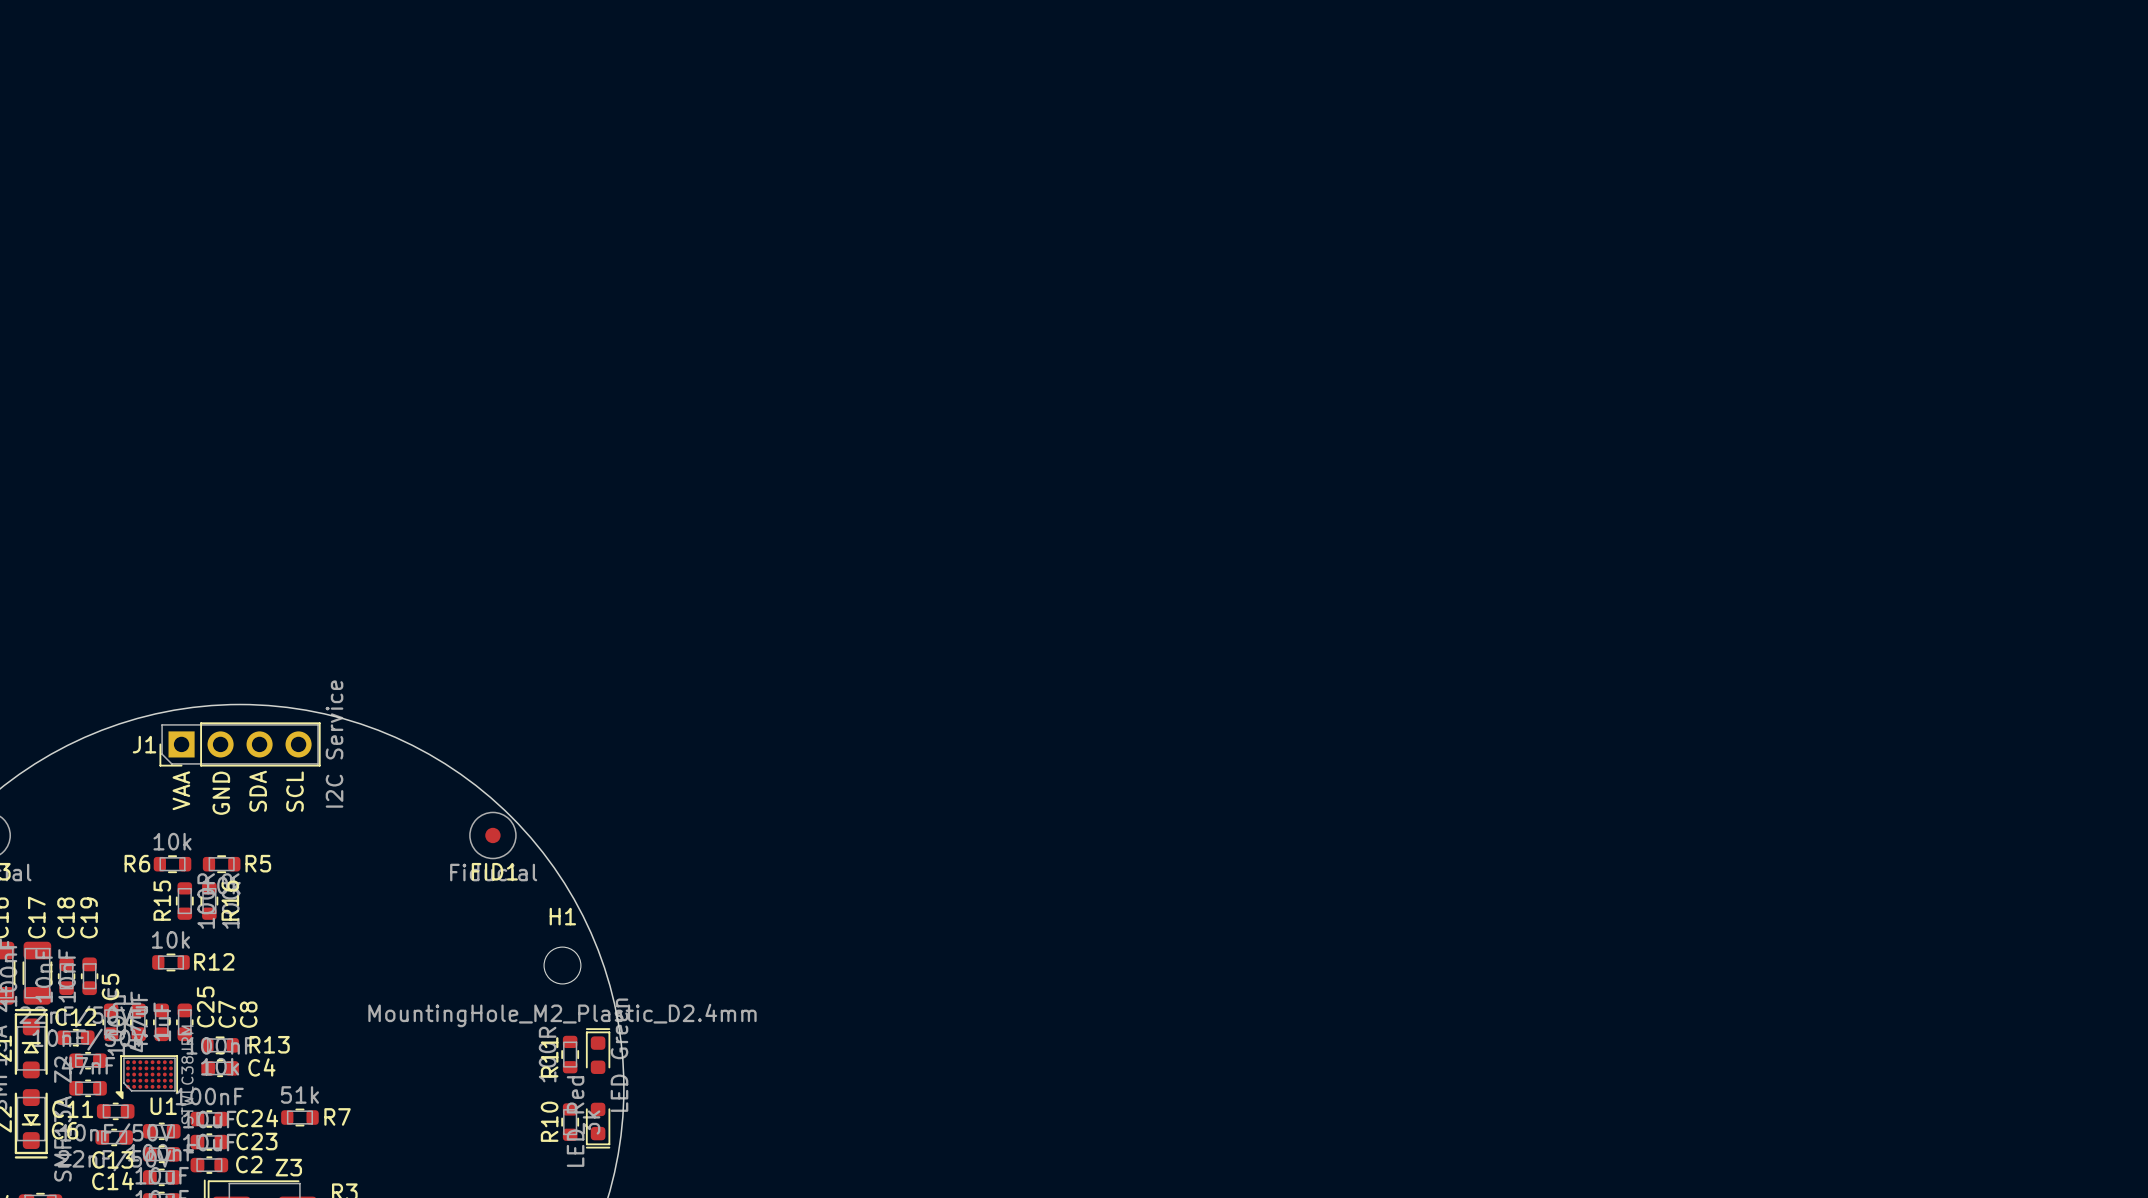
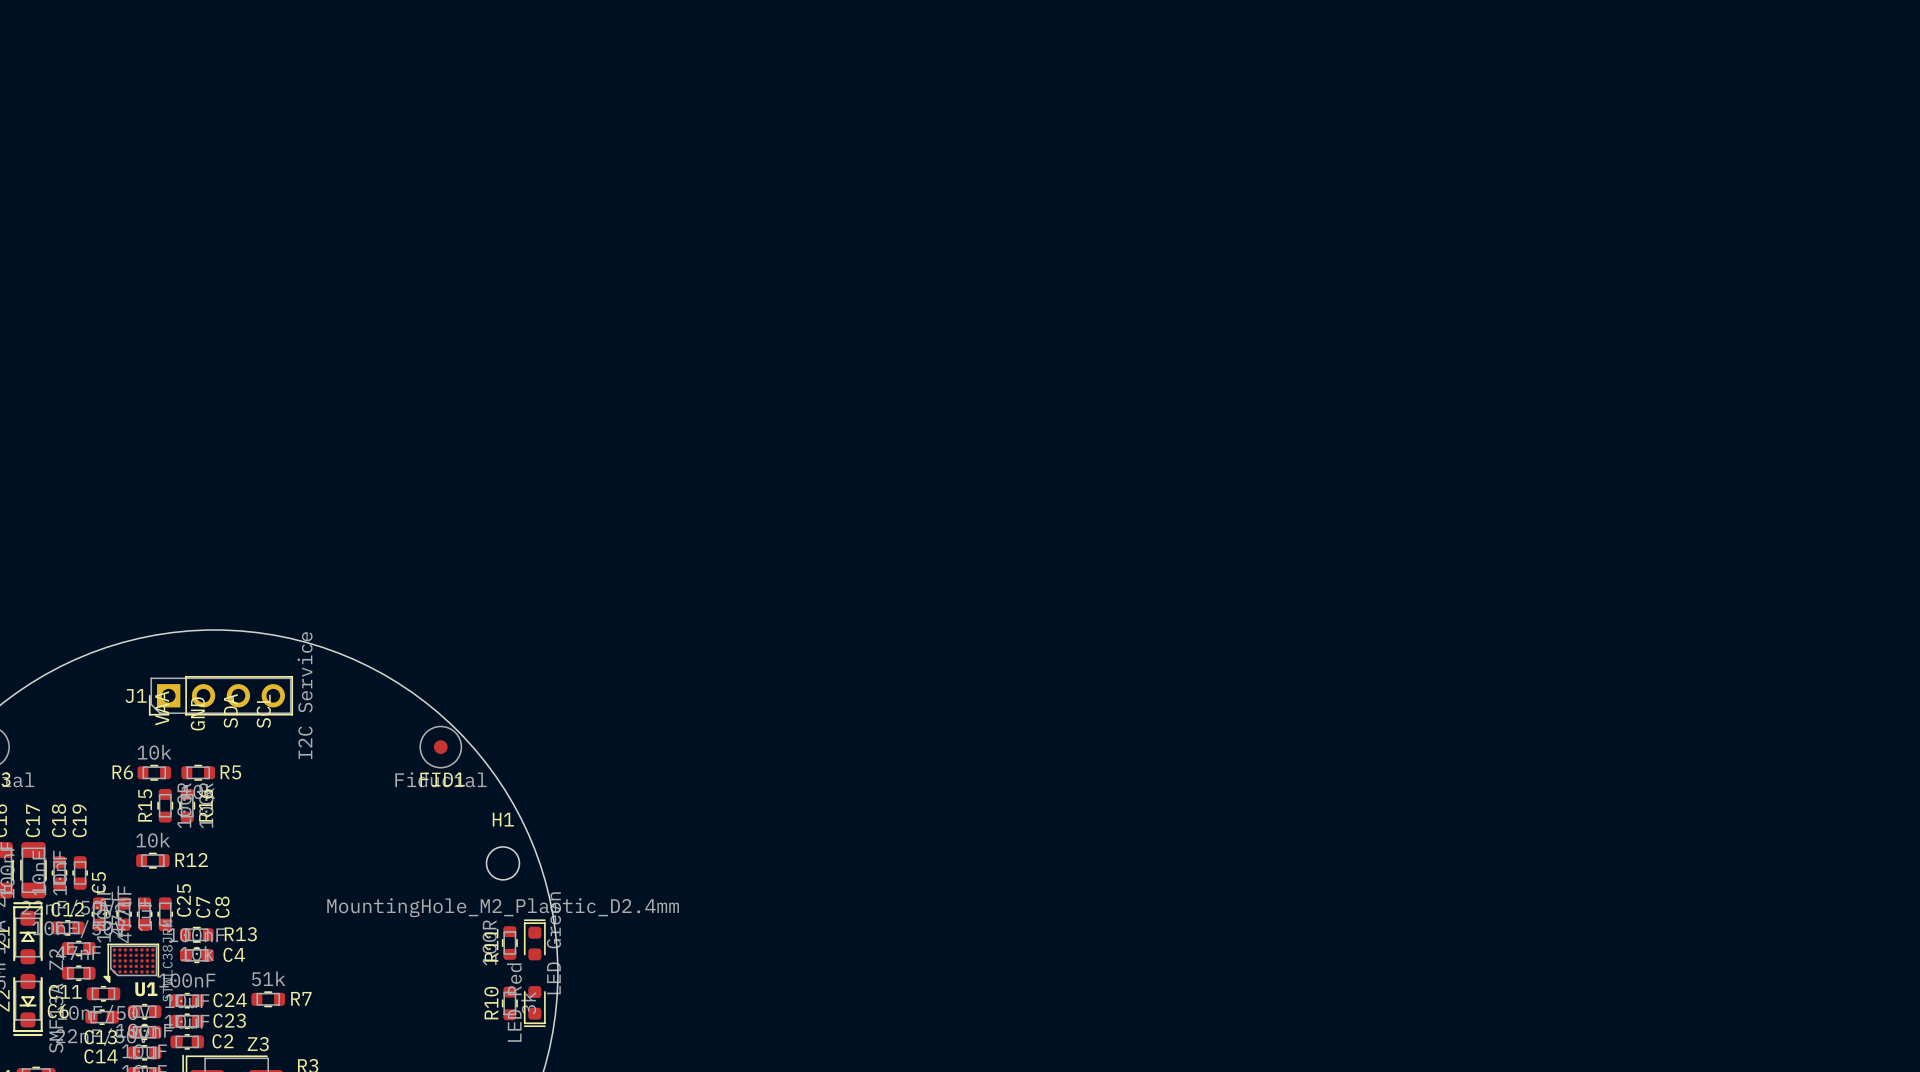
J1 position: (240, 744) -> (220, 695)

